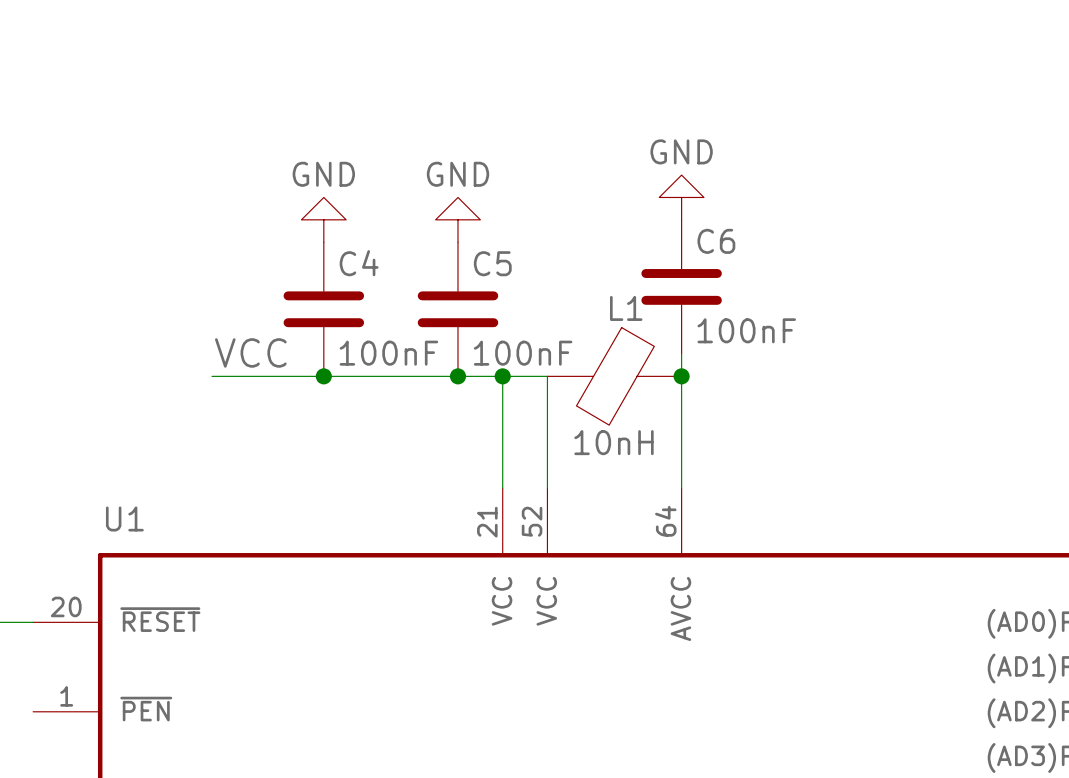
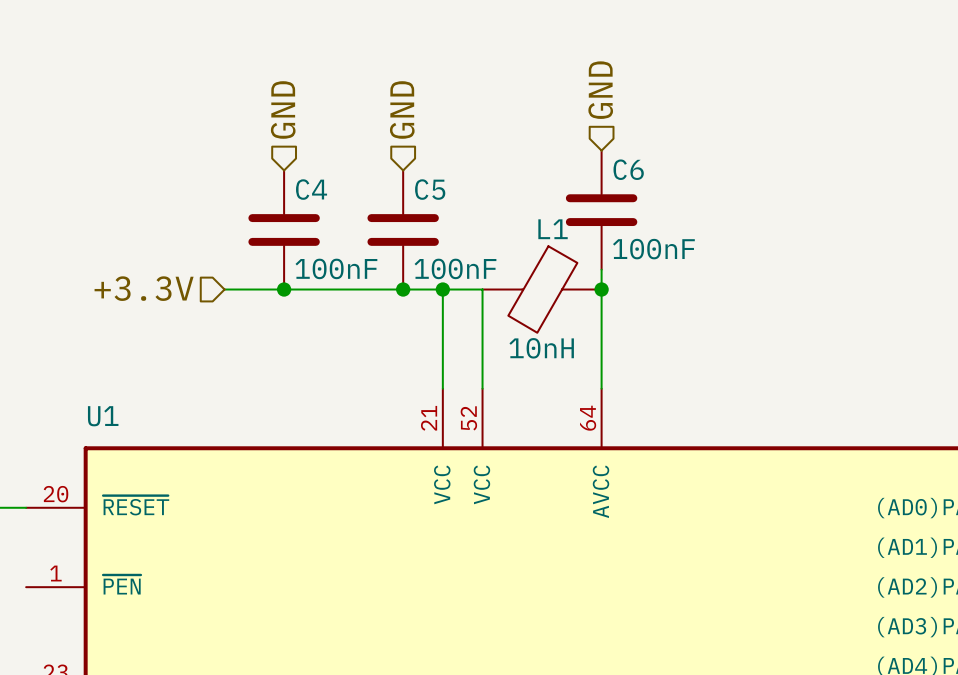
hierarchical label: none -> GND (600, 90)
hierarchical label: none -> GND (283, 109)
hierarchical label: none -> GND (402, 109)
power symbol: GND (681, 197) -> none
power symbol: GND (323, 219) -> none
power symbol: GND (457, 219) -> none
label: VCC (250, 352) -> none
hierarchical label: none -> +3.3V (144, 288)
wire: (212, 376) (256, 376) -> none

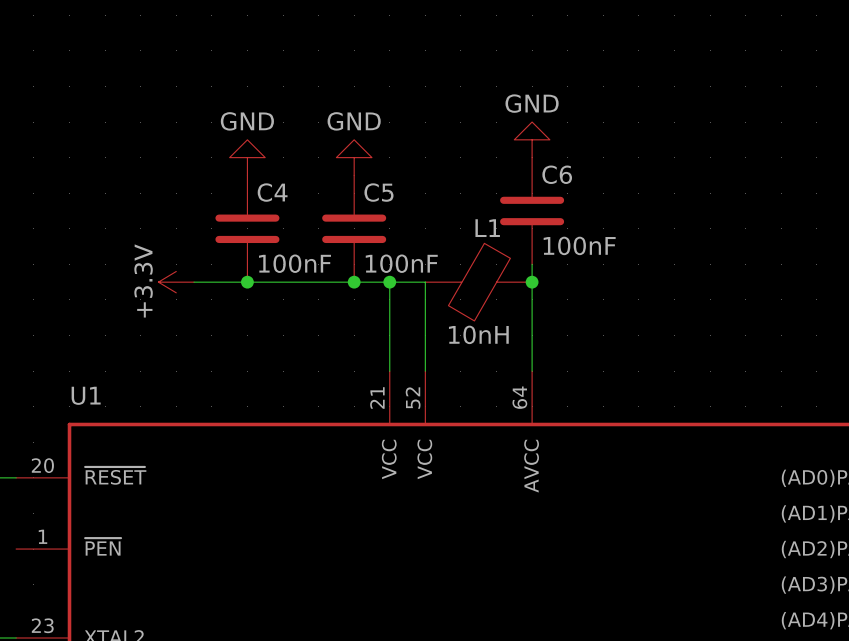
hierarchical label: GND (600, 90) -> none
hierarchical label: GND (283, 109) -> none
hierarchical label: GND (402, 109) -> none
power symbol: none -> GND (532, 139)
power symbol: none -> GND (247, 157)
power symbol: none -> GND (354, 157)
hierarchical label: +3.3V (144, 288) -> none
power symbol: none -> +3.3V (176, 282)

